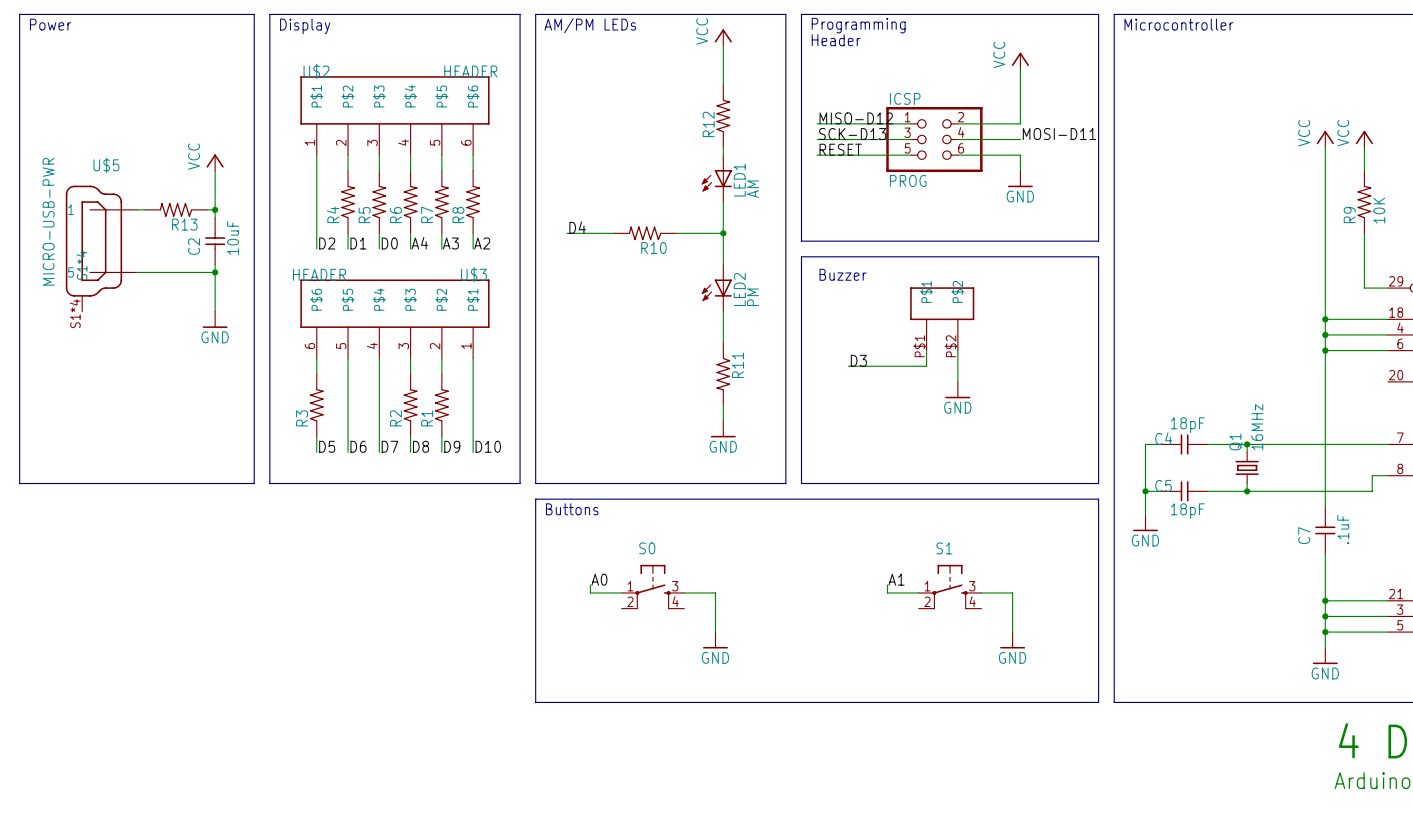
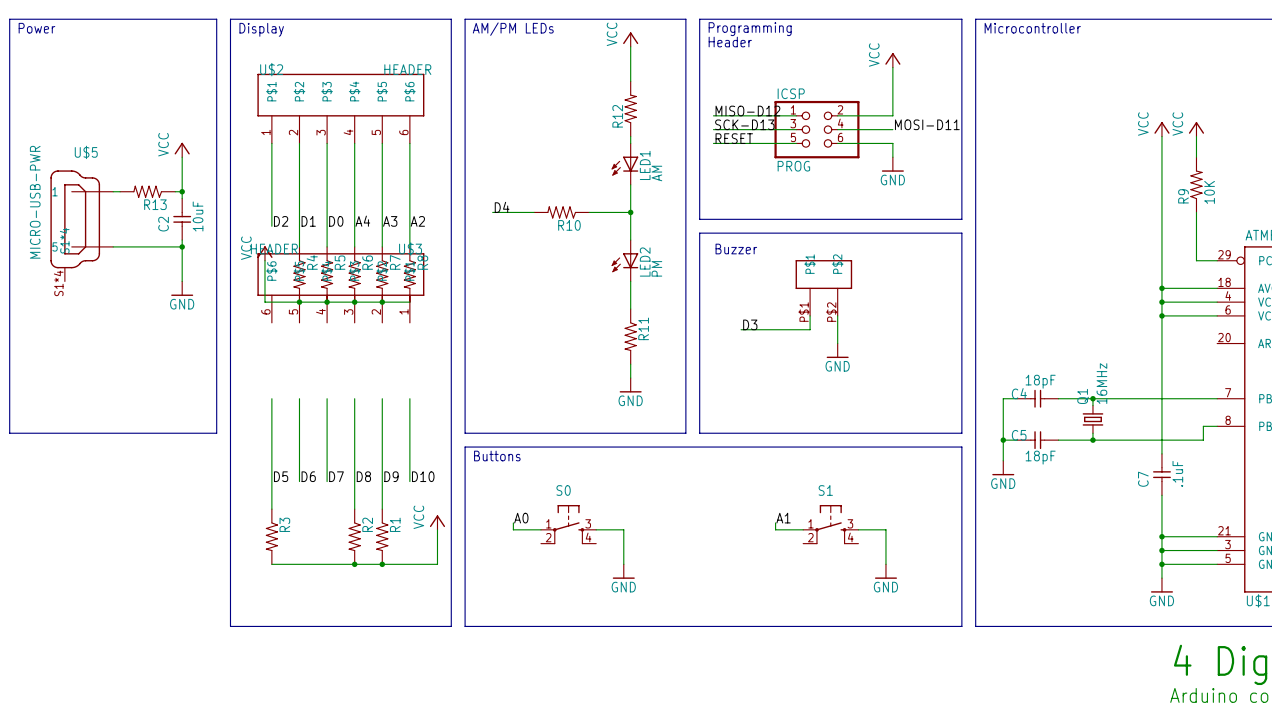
R4 rotation: 0° (348, 202) -> 180° (299, 274)
R4 position: (348, 202) -> (299, 274)
R5 rotation: 0° (379, 202) -> 180° (327, 274)
R5 position: (379, 202) -> (327, 274)
R6 rotation: 0° (410, 202) -> 180° (354, 274)
R6 position: (410, 202) -> (354, 274)
R7 rotation: 0° (441, 202) -> 180° (382, 274)
R7 position: (441, 202) -> (382, 274)
R8 rotation: 0° (473, 202) -> 180° (409, 274)
R8 position: (473, 202) -> (409, 274)
wire: none -> (299, 226) (299, 246)
wire: none -> (327, 226) (327, 246)
wire: none -> (354, 226) (354, 246)
wire: none -> (382, 226) (382, 246)
wire: none -> (409, 226) (409, 246)
power symbol: none -> VCC (264, 253)
wire: none -> (264, 260) (264, 302) (409, 302)
junction: none -> (299, 302)
junction: none -> (327, 302)
junction: none -> (354, 302)
junction: none -> (382, 302)
wire: (316, 358) (316, 374) -> none
wire: (348, 358) (348, 444) -> (299, 405) (299, 481)
wire: (379, 358) (379, 444) -> (327, 405) (327, 481)
wire: (410, 358) (410, 374) -> none
wire: (441, 358) (441, 374) -> none
wire: (473, 358) (473, 444) -> (409, 405) (409, 481)
R3 rotation: 0° (316, 405) -> 180° (271, 536)
R3 position: (316, 405) -> (271, 536)
R2 rotation: 0° (410, 405) -> 180° (354, 536)
R2 position: (410, 405) -> (354, 536)
R1 rotation: 0° (441, 405) -> 180° (382, 536)
R1 position: (441, 405) -> (382, 536)
wire: (316, 436) (316, 444) -> none
wire: (410, 436) (410, 444) -> none
wire: (441, 436) (441, 444) -> none
label position: D5 (327, 446) -> D5 (281, 476)
label position: D6 (358, 446) -> D6 (308, 476)
label position: D7 (389, 446) -> D7 (336, 476)
label position: D8 (421, 446) -> D8 (363, 476)
label position: D9 (452, 446) -> D9 (391, 476)
label position: D10 (488, 446) -> D10 (423, 476)
wire: none -> (271, 405) (271, 509)
wire: none -> (354, 405) (354, 509)
wire: none -> (382, 405) (382, 509)
line: (269, 483) (520, 483) -> (230, 433) (230, 626) (451, 626) (451, 433)
power symbol: none -> VCC (437, 522)
wire: none -> (437, 529) (437, 564) (271, 564)
junction: none -> (354, 564)
junction: none -> (382, 564)

